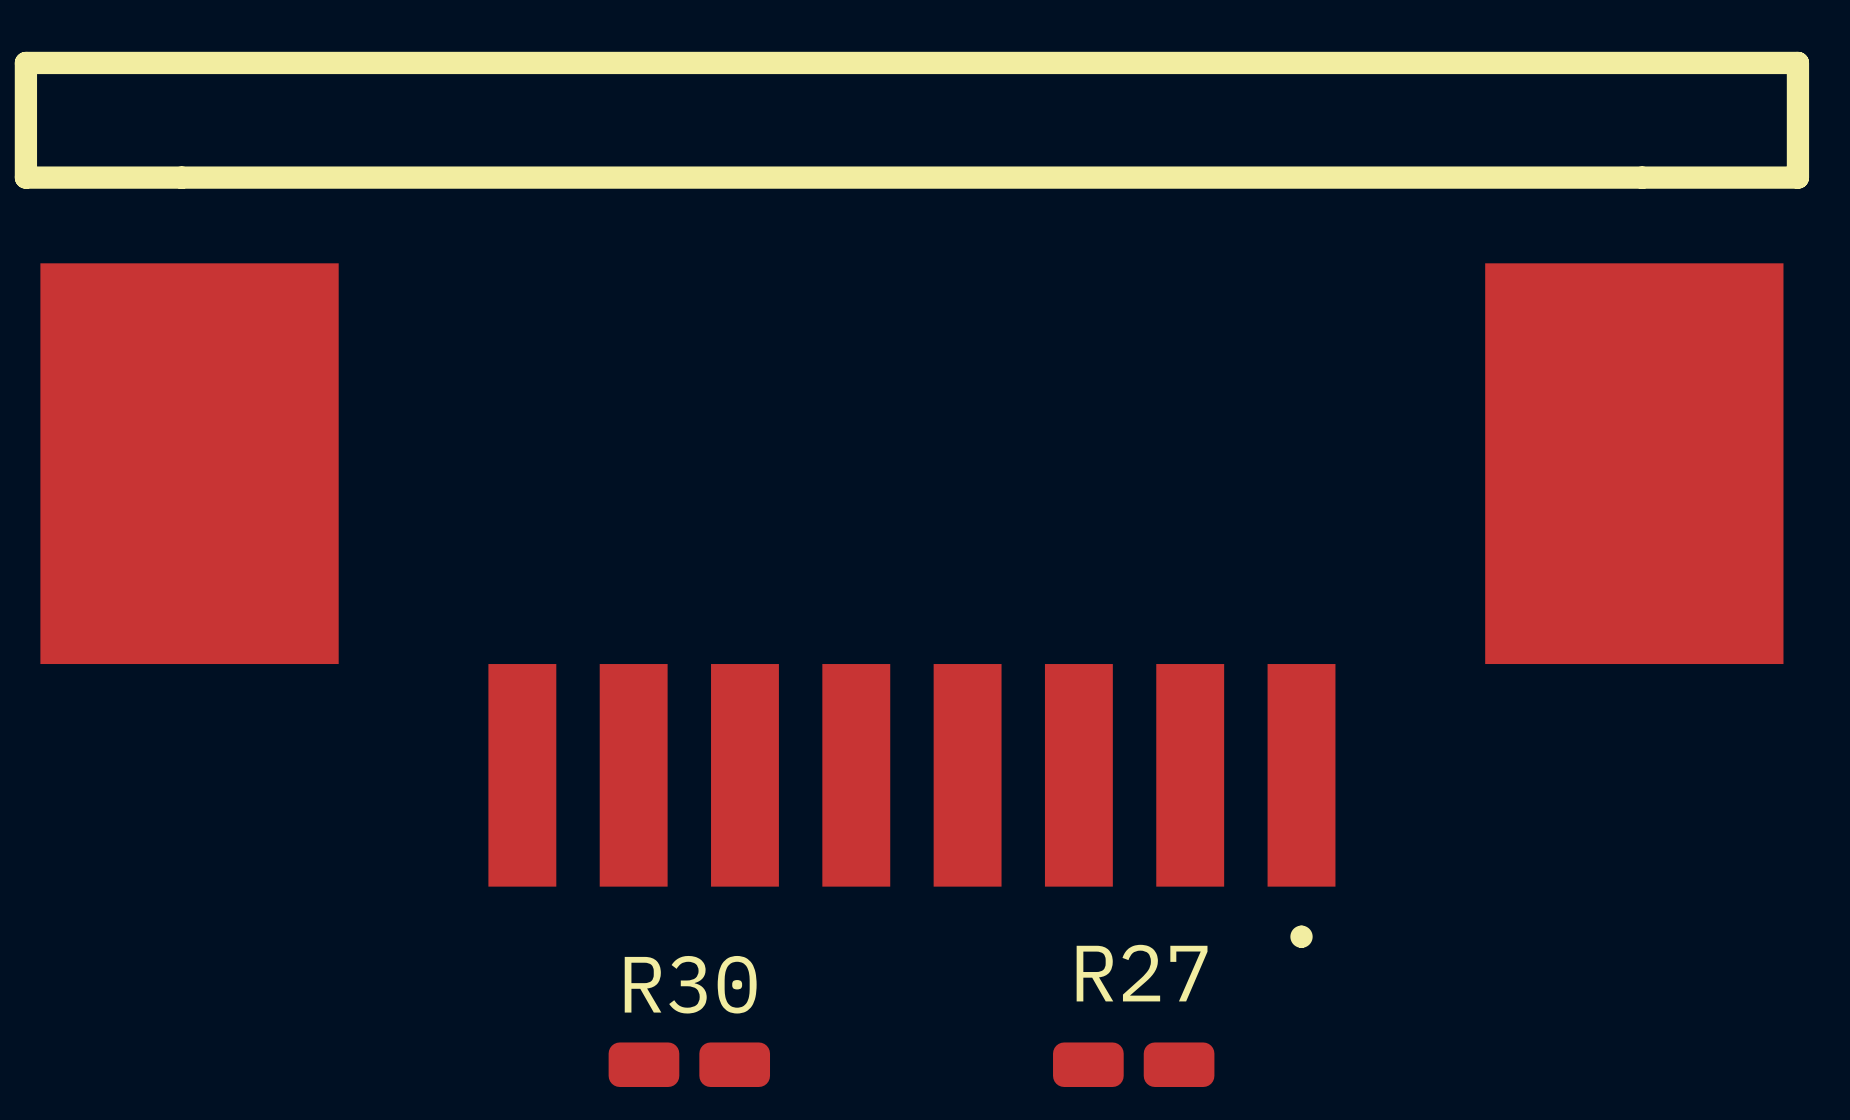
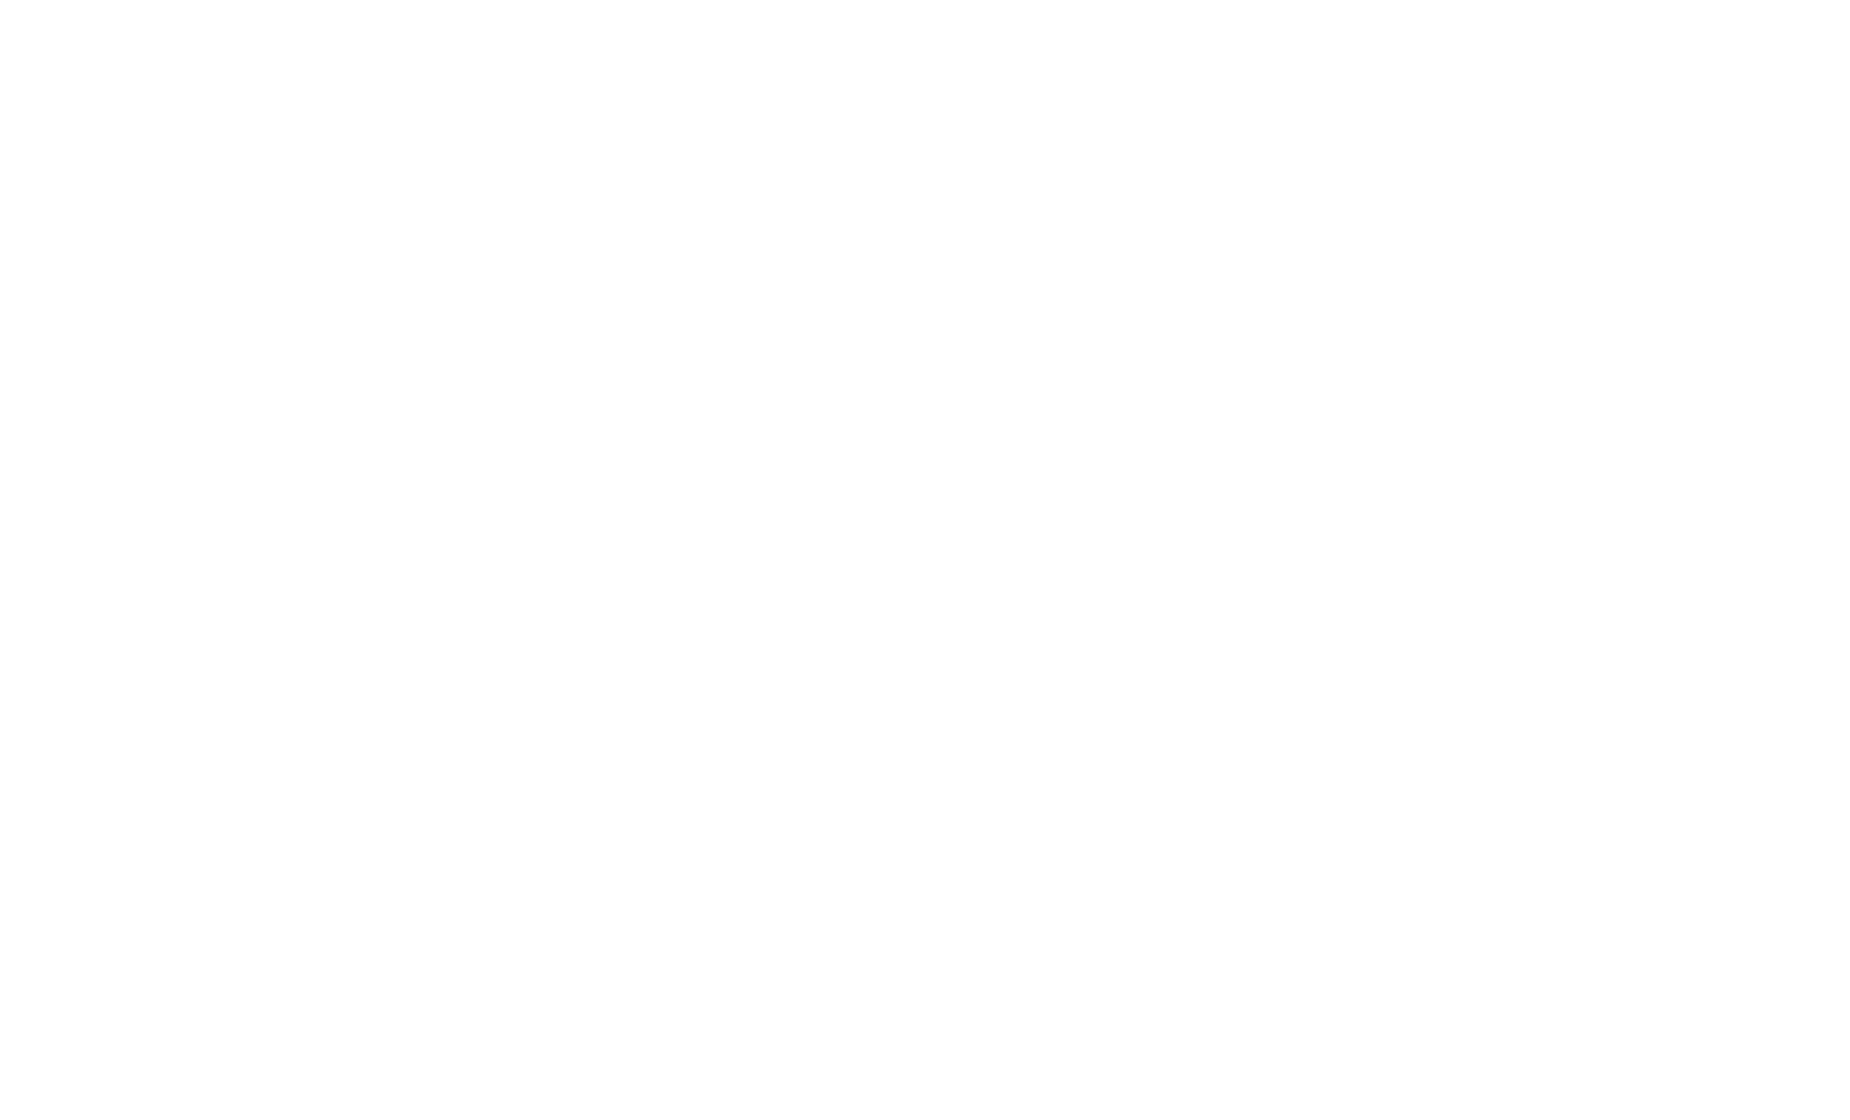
part: (911, 499) -> none
R30: (689, 1064) -> none
R27: (1133, 1064) -> none

